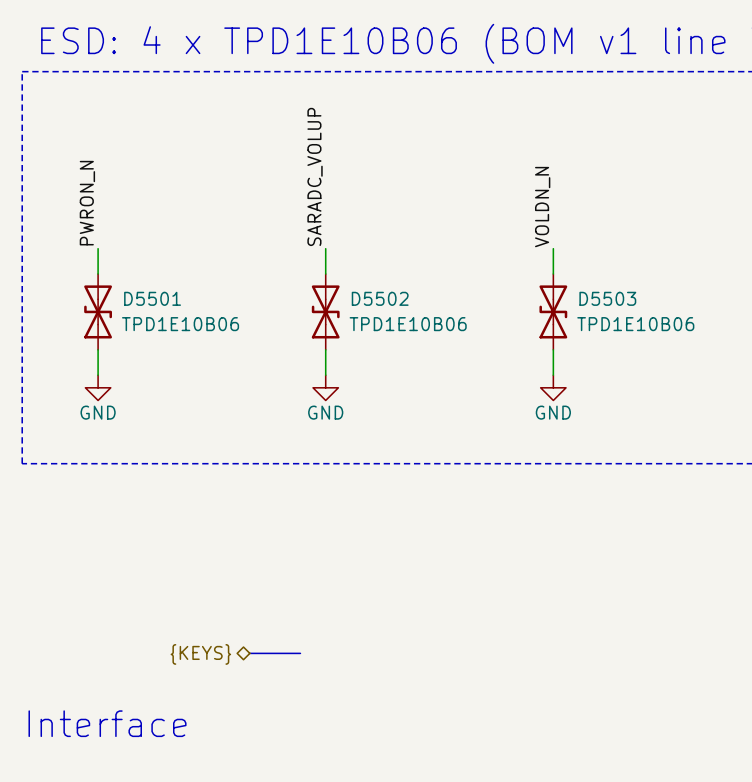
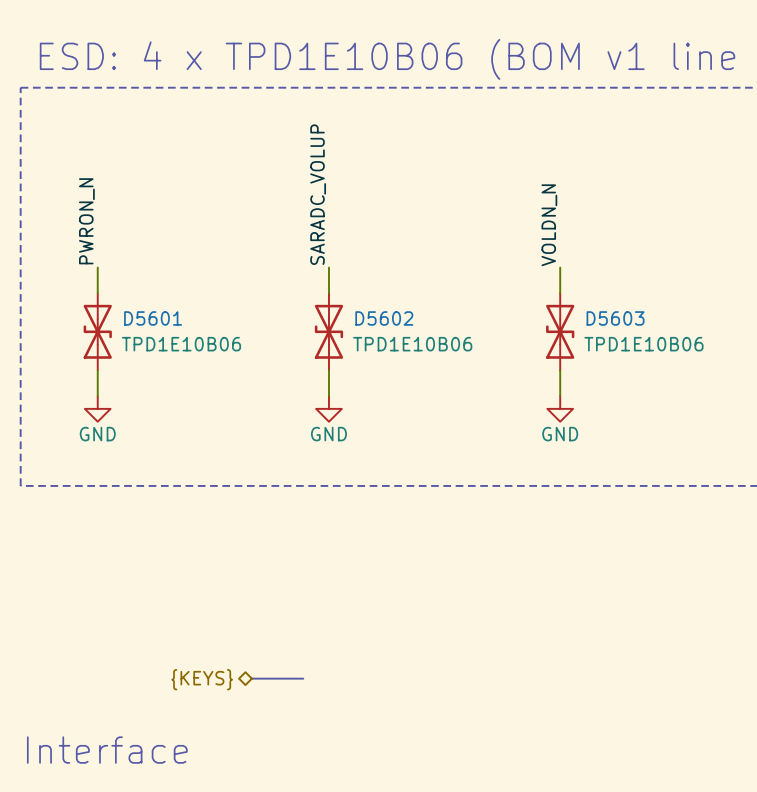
D5501 name: D5501 (152, 298) -> D5601 (153, 318)
D5502 name: D5502 (380, 298) -> D5602 (384, 318)
D5503 name: D5503 (607, 298) -> D5603 (615, 318)

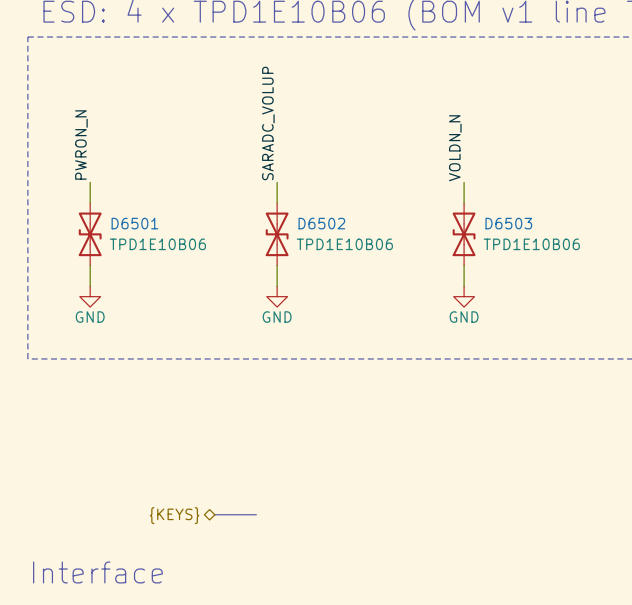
D5601 name: D5601 (153, 318) -> D6501 (134, 223)
D5602 name: D5602 (384, 318) -> D6502 (321, 223)
D5603 name: D5603 (615, 318) -> D6503 (508, 223)

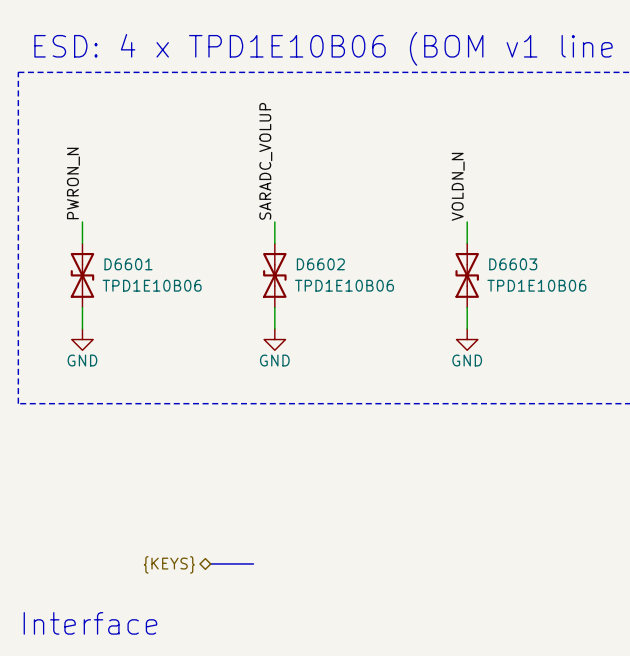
D6501 name: D6501 (134, 223) -> D6601 (128, 264)
D6502 name: D6502 (321, 223) -> D6602 (320, 264)
D6503 name: D6503 (508, 223) -> D6603 (513, 264)

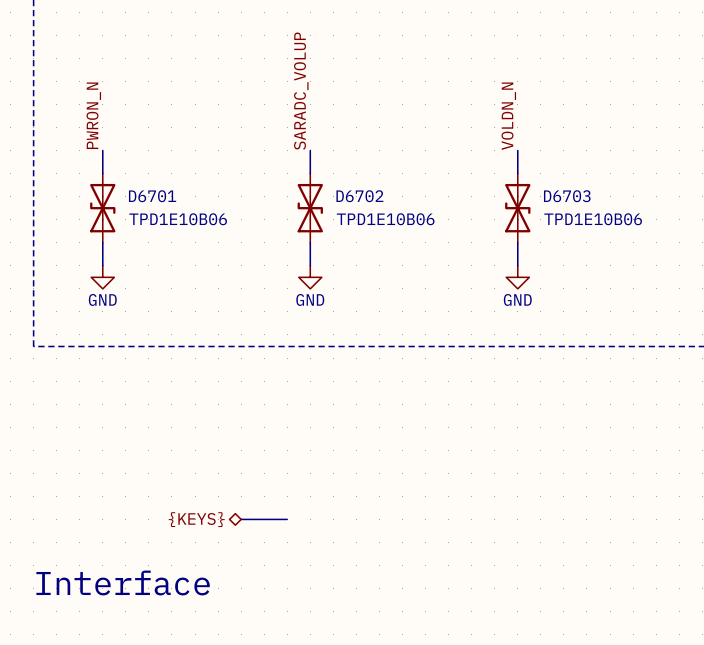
D6601 name: D6601 (128, 264) -> D6701 (152, 196)
D6602 name: D6602 (320, 264) -> D6702 (359, 196)
D6603 name: D6603 (513, 264) -> D6703 (567, 196)

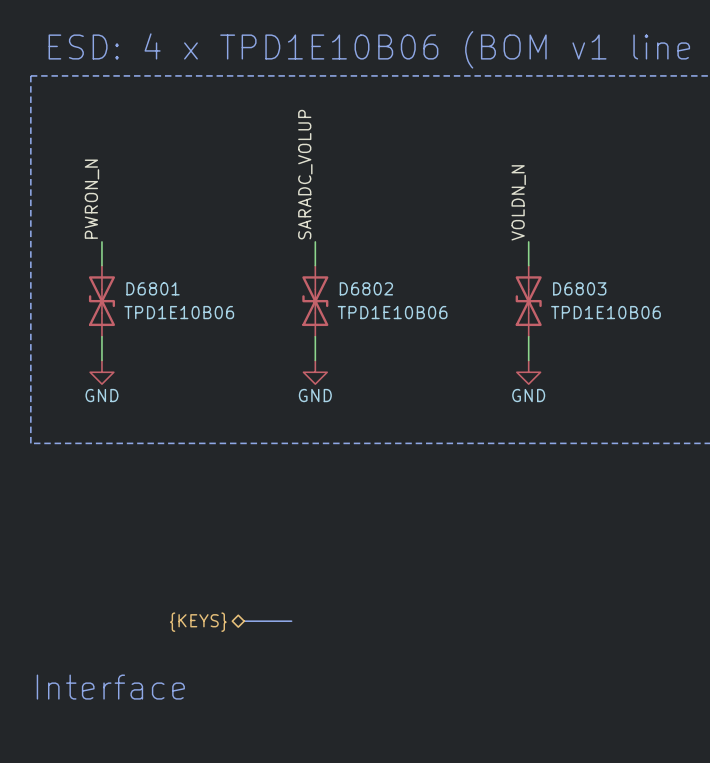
D6701 name: D6701 (152, 196) -> D6801 (153, 288)
D6702 name: D6702 (359, 196) -> D6802 (366, 288)
D6703 name: D6703 (567, 196) -> D6803 (579, 288)

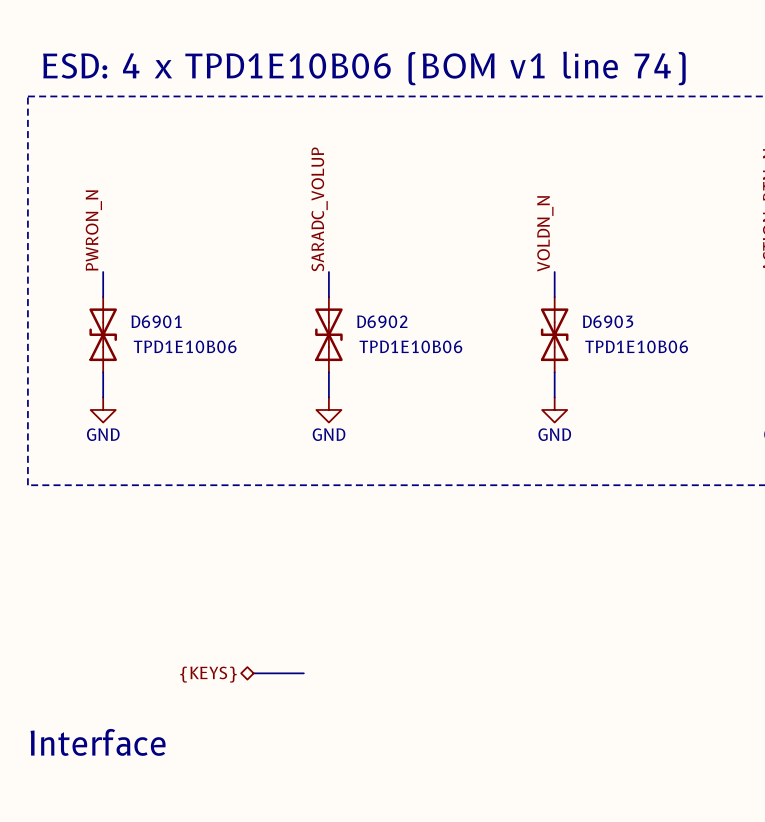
D6801 name: D6801 (153, 288) -> D6901 (156, 321)
D6802 name: D6802 (366, 288) -> D6902 (382, 321)
D6803 name: D6803 (579, 288) -> D6903 (608, 321)

